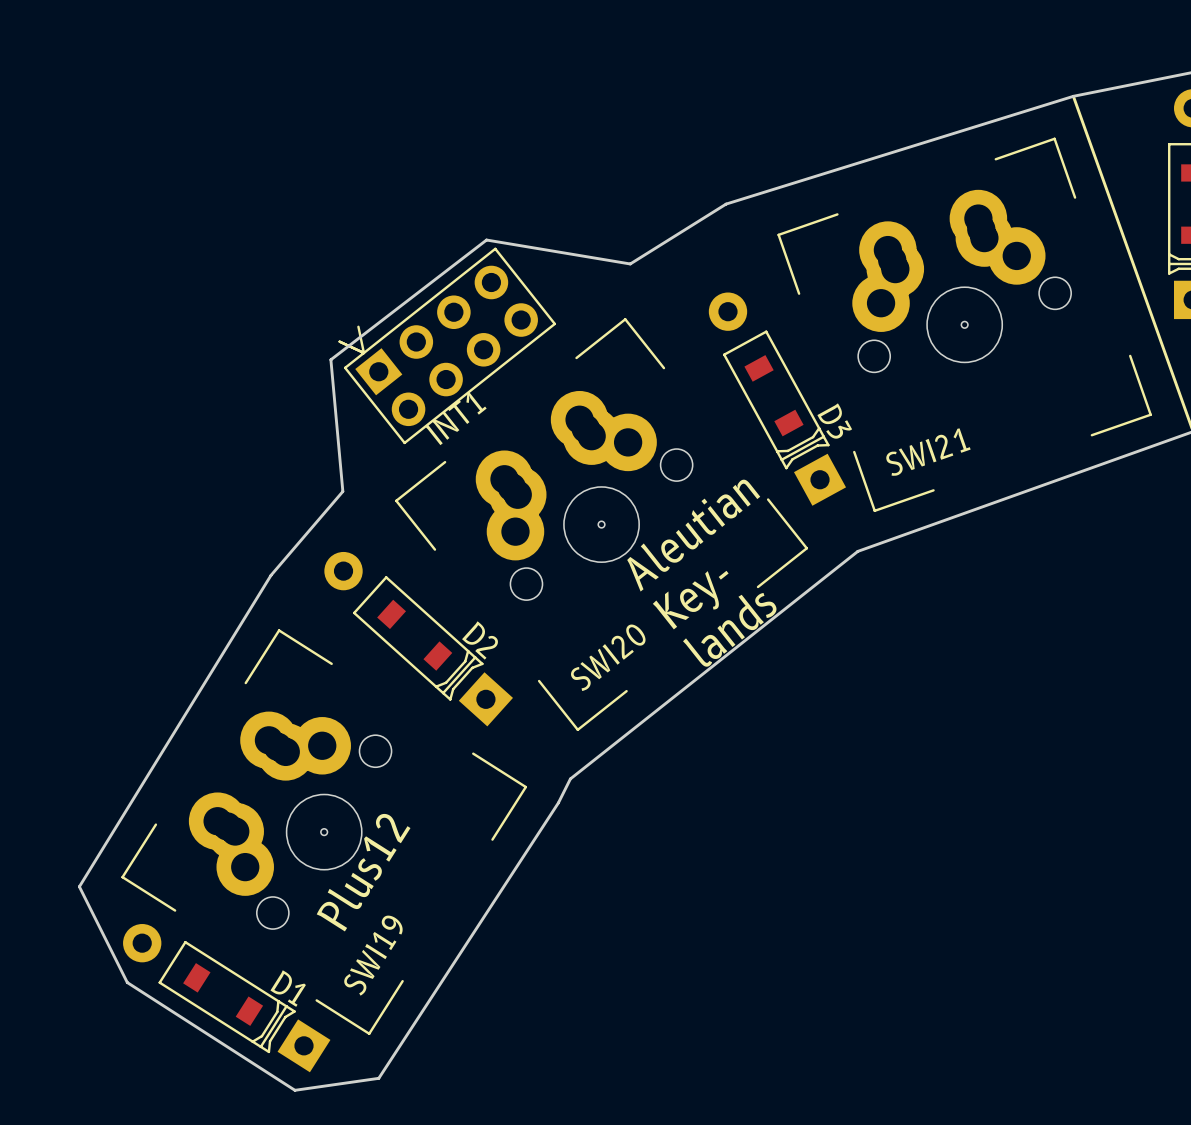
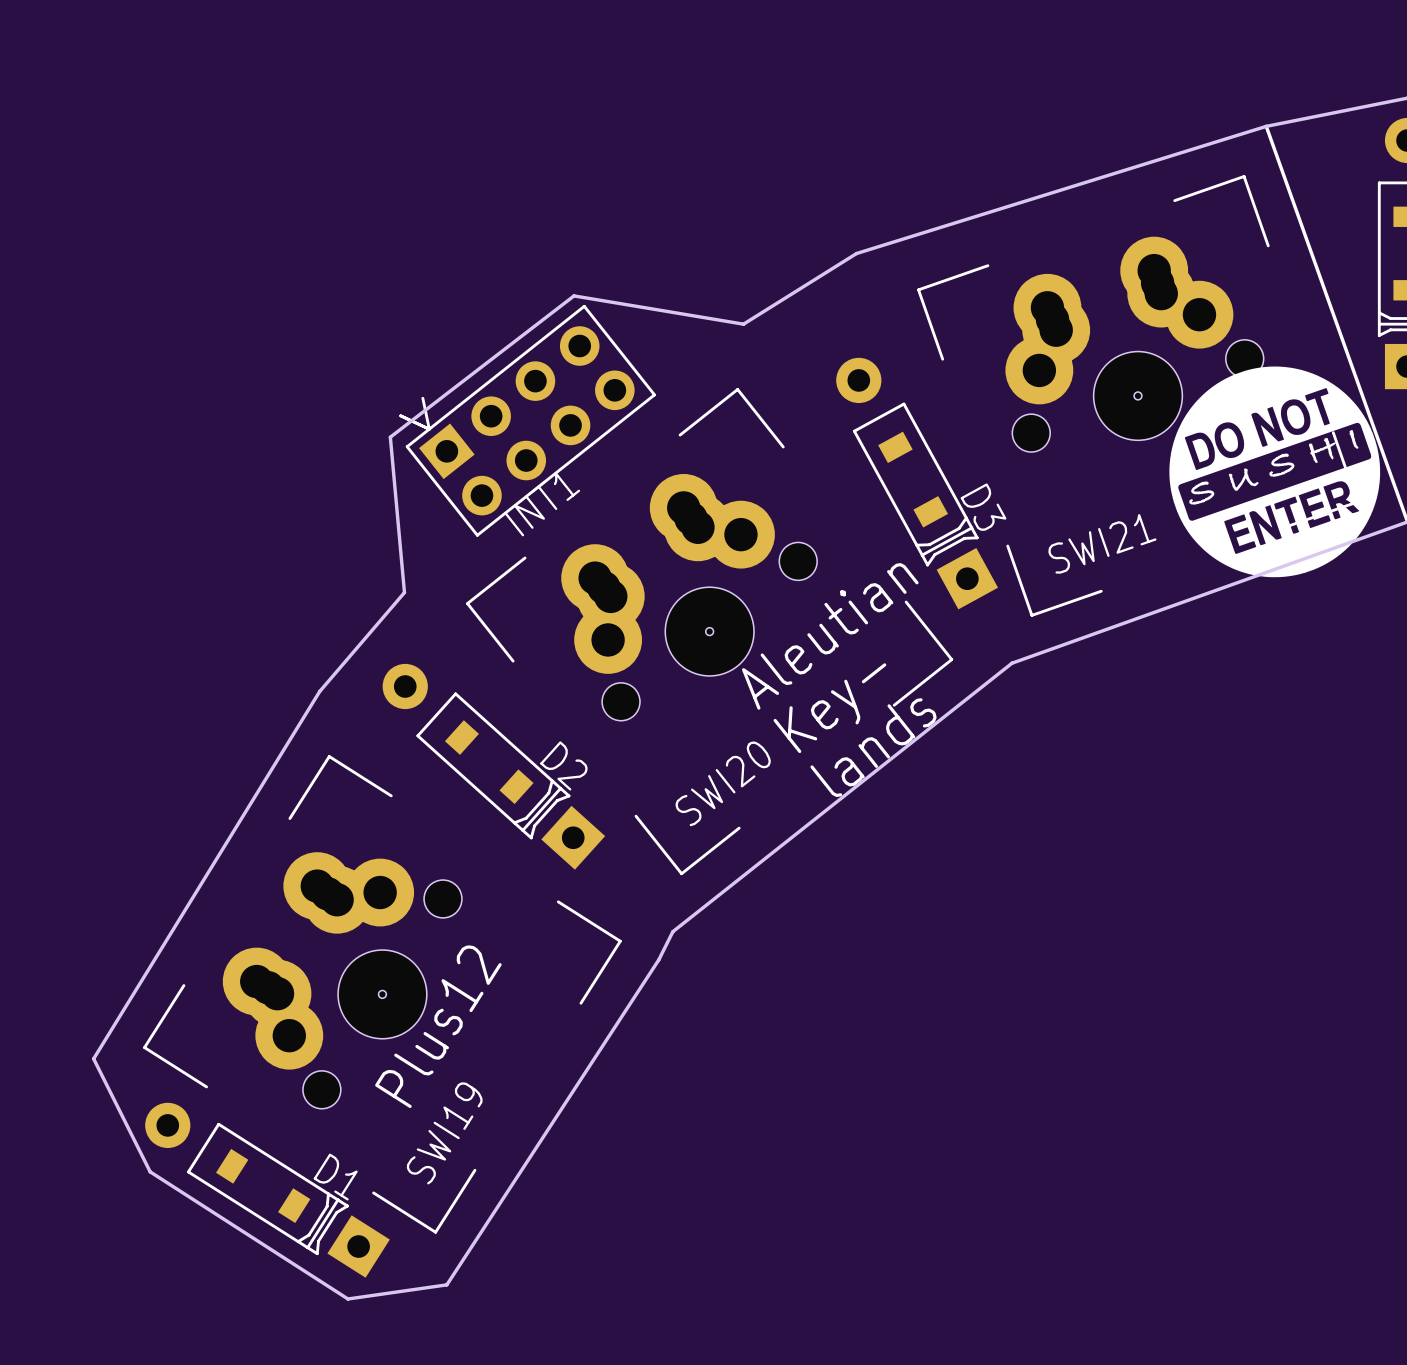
drawing: none -> [1169, 366, 1381, 578]

